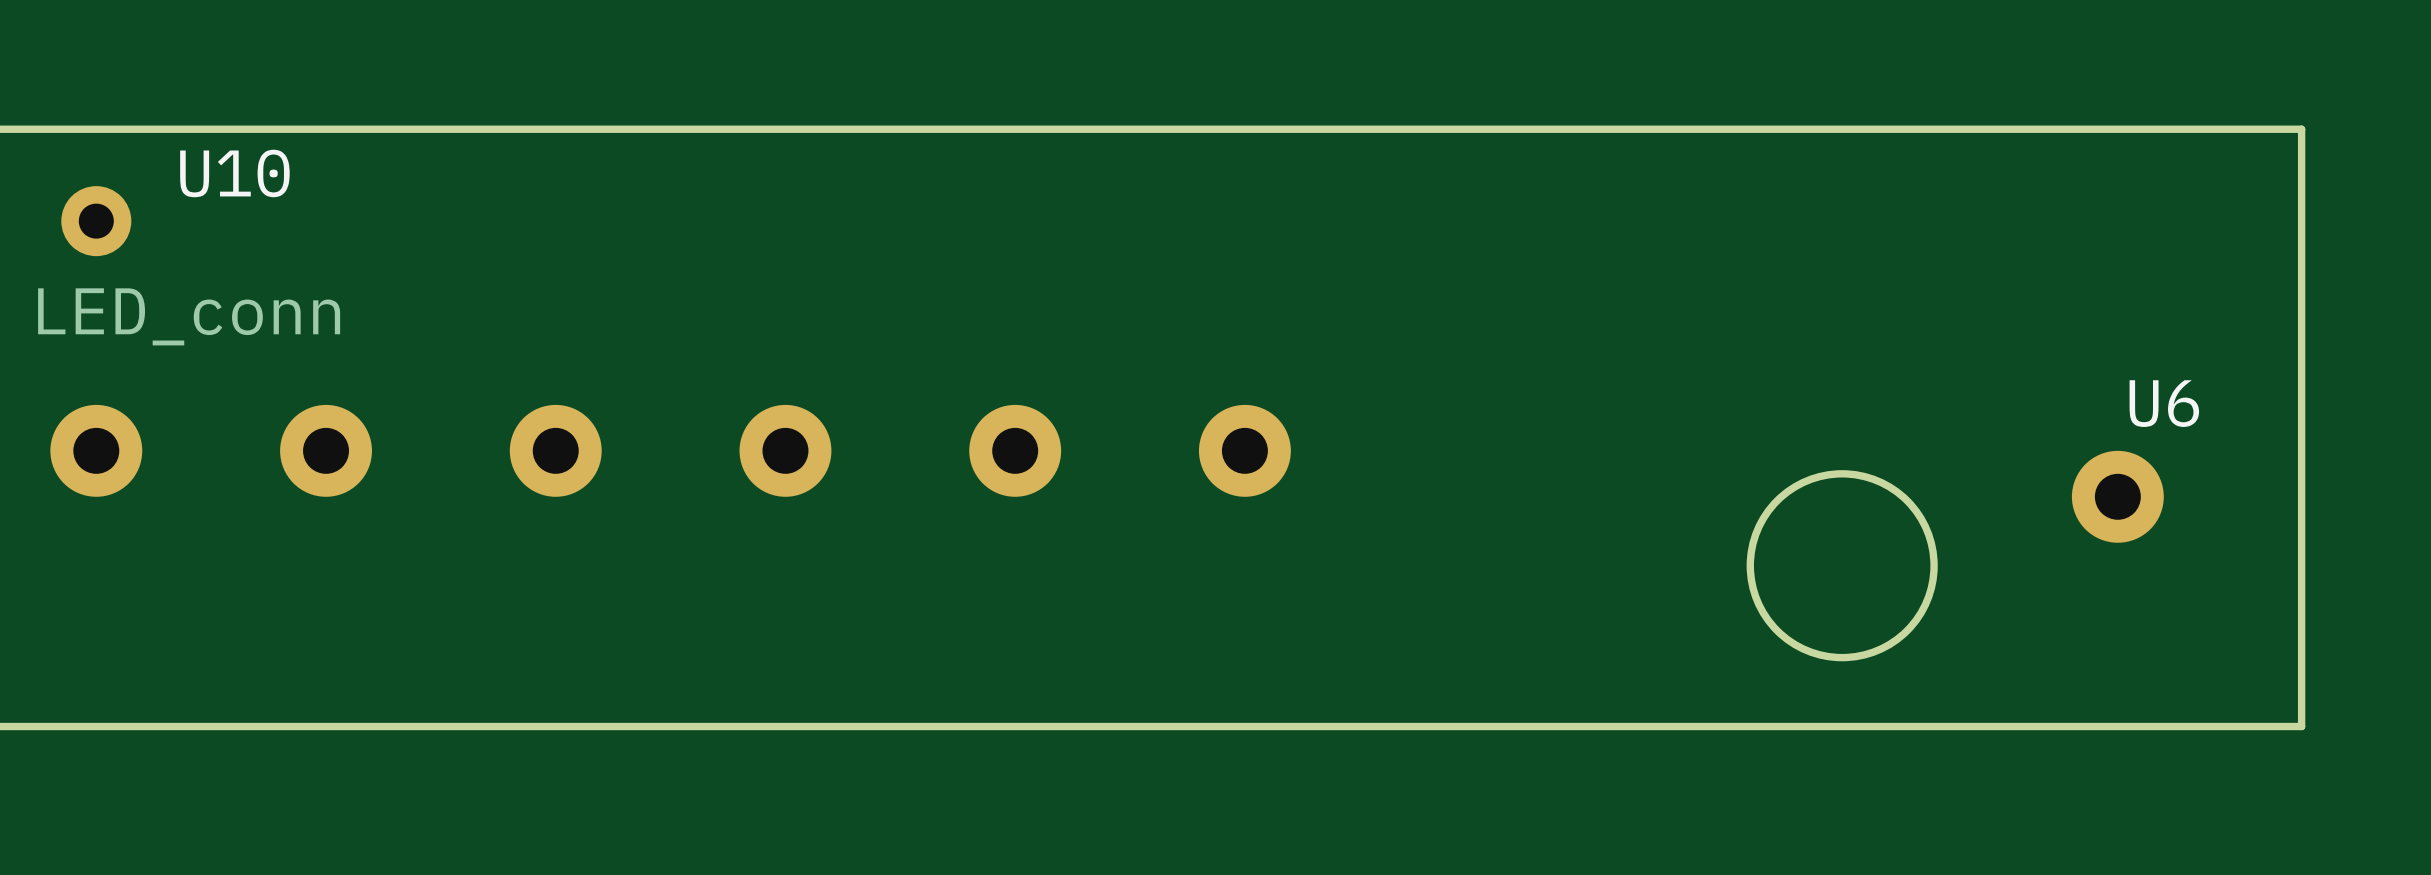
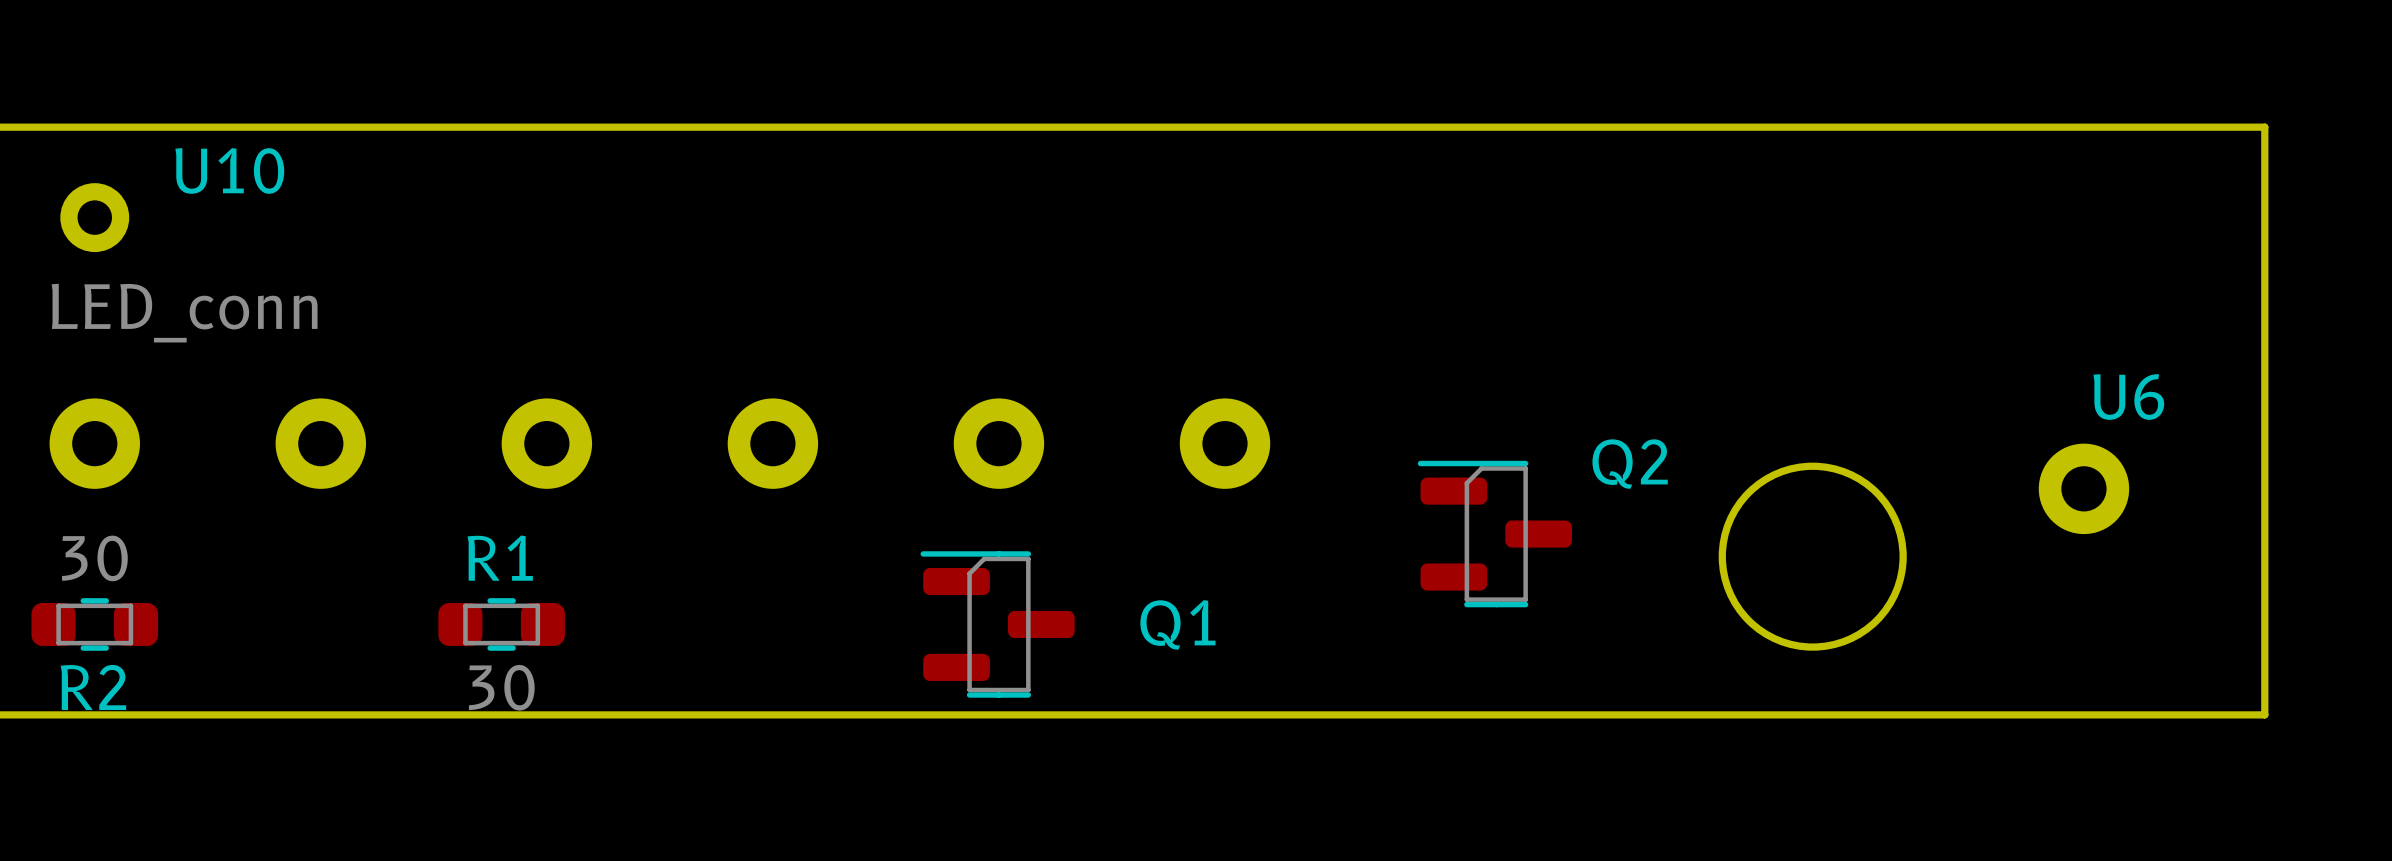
Q2: none -> (1494, 534)
R2: none -> 30 (94, 624)
R1: none -> 30 (501, 624)
Q1: none -> (997, 624)

